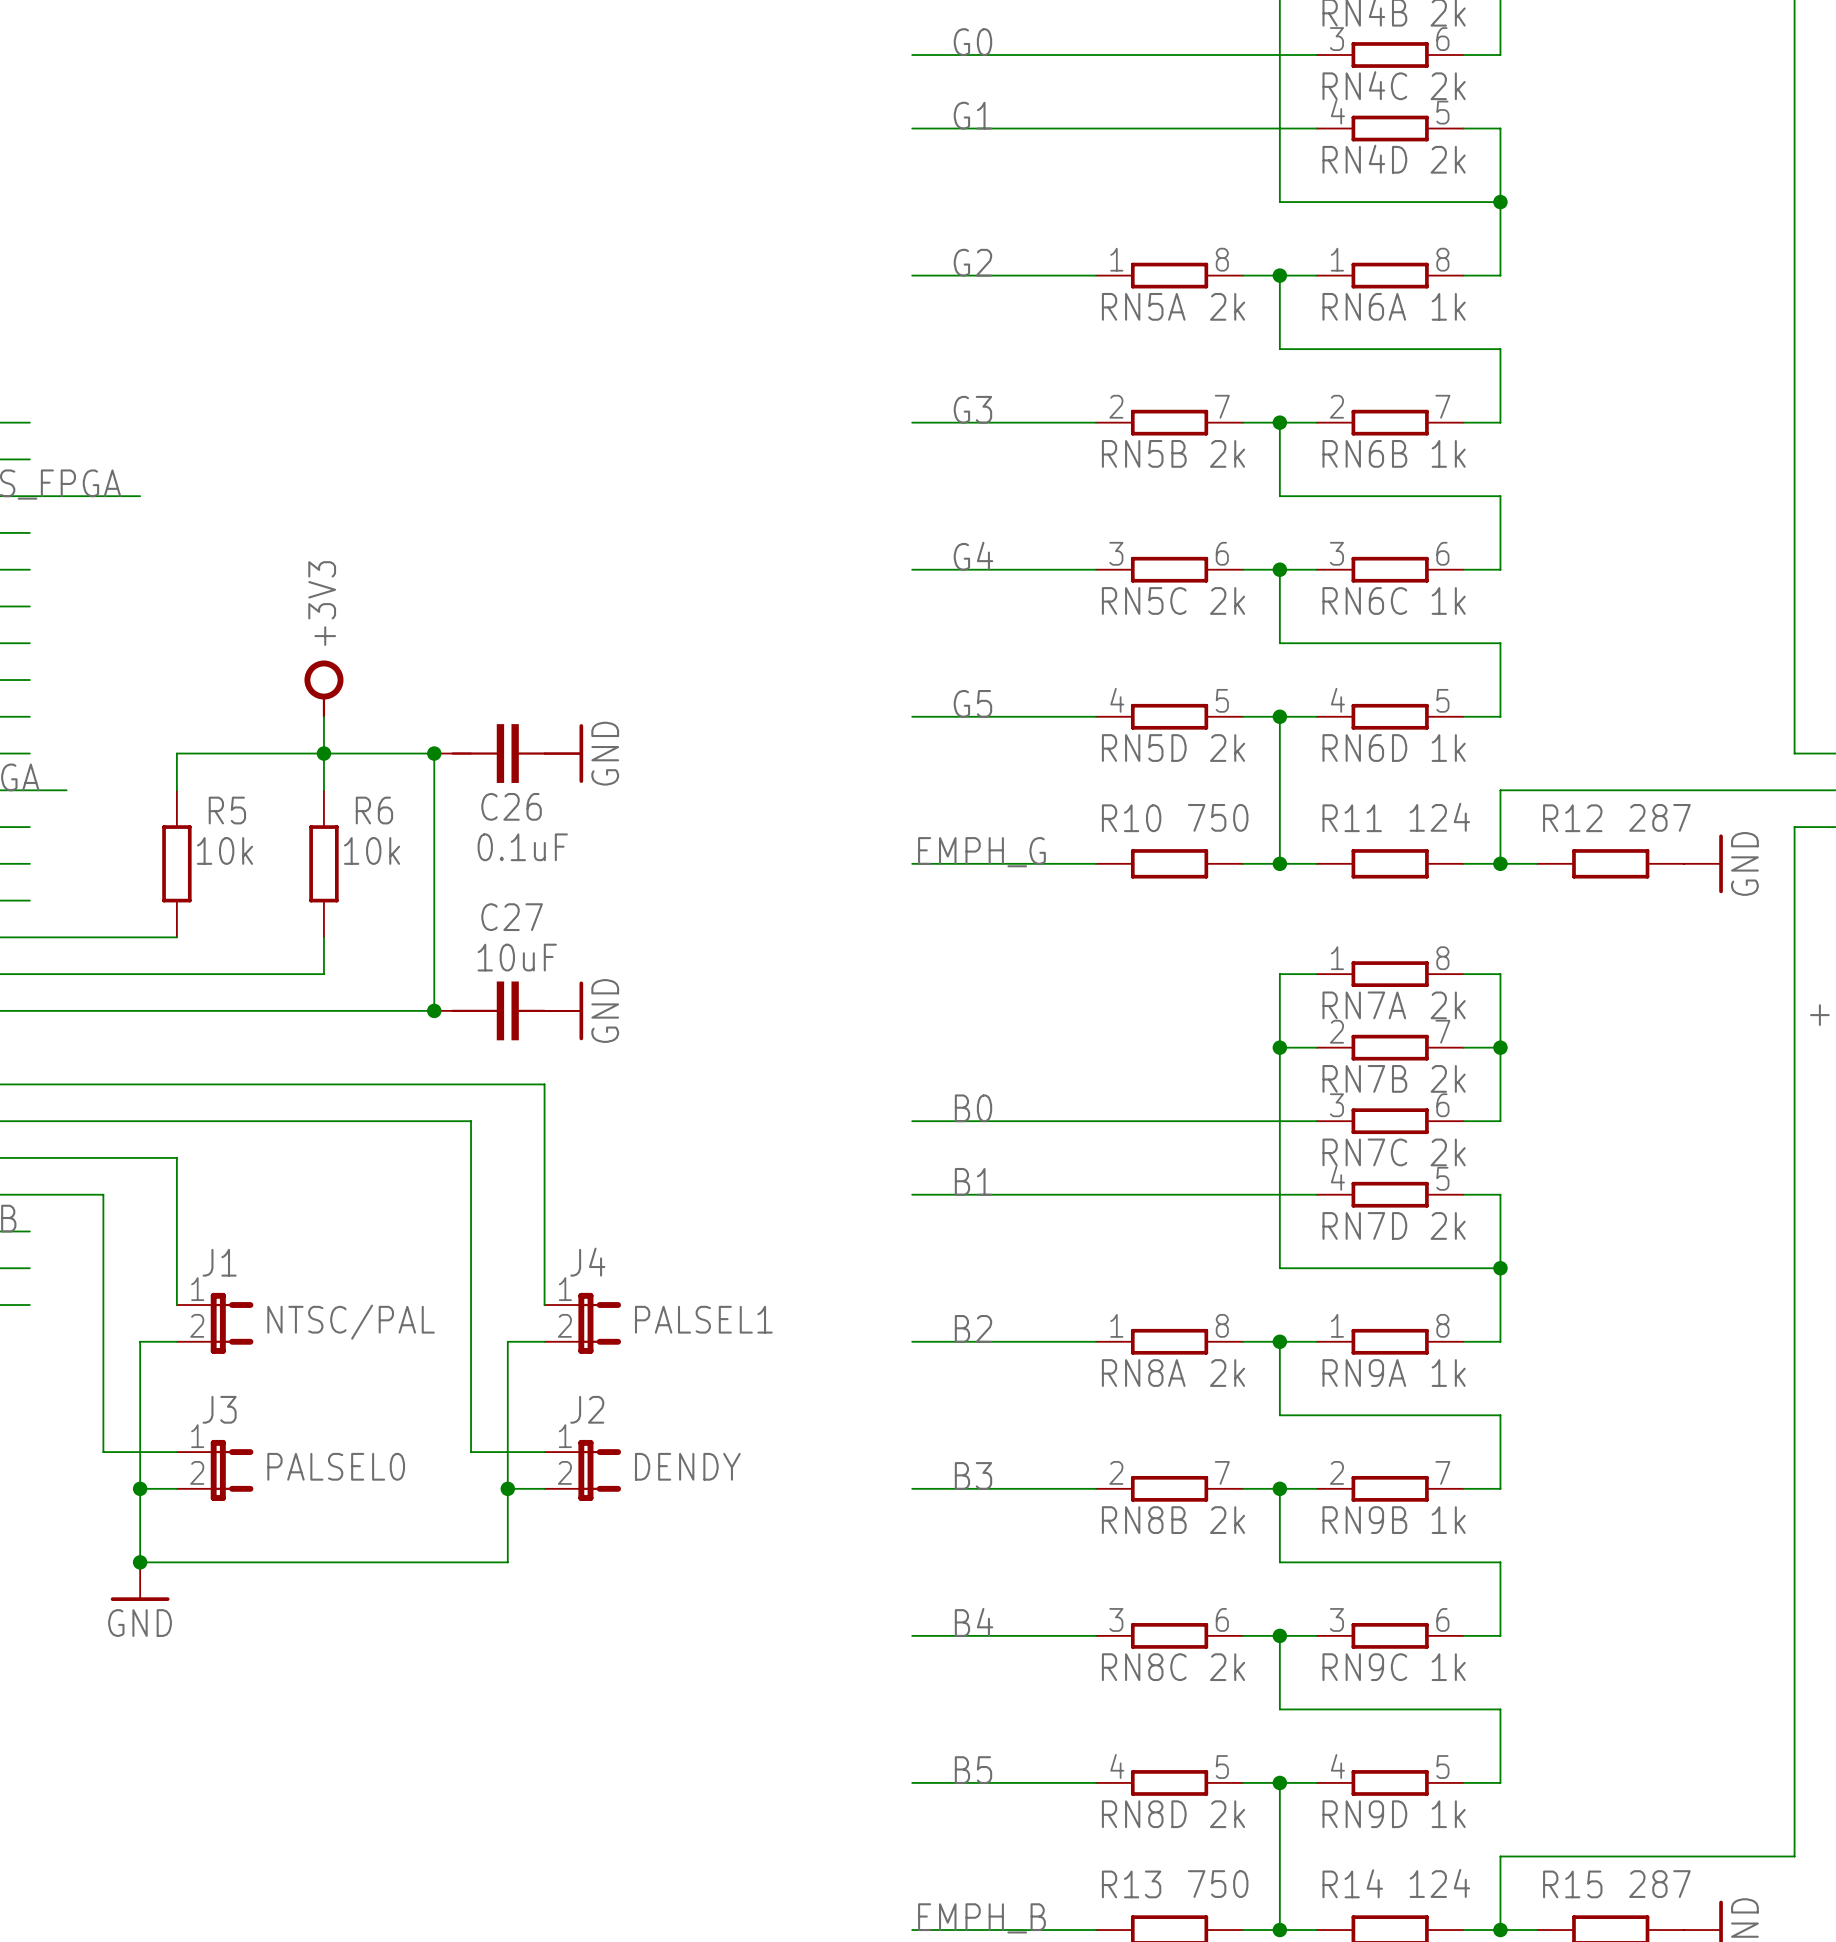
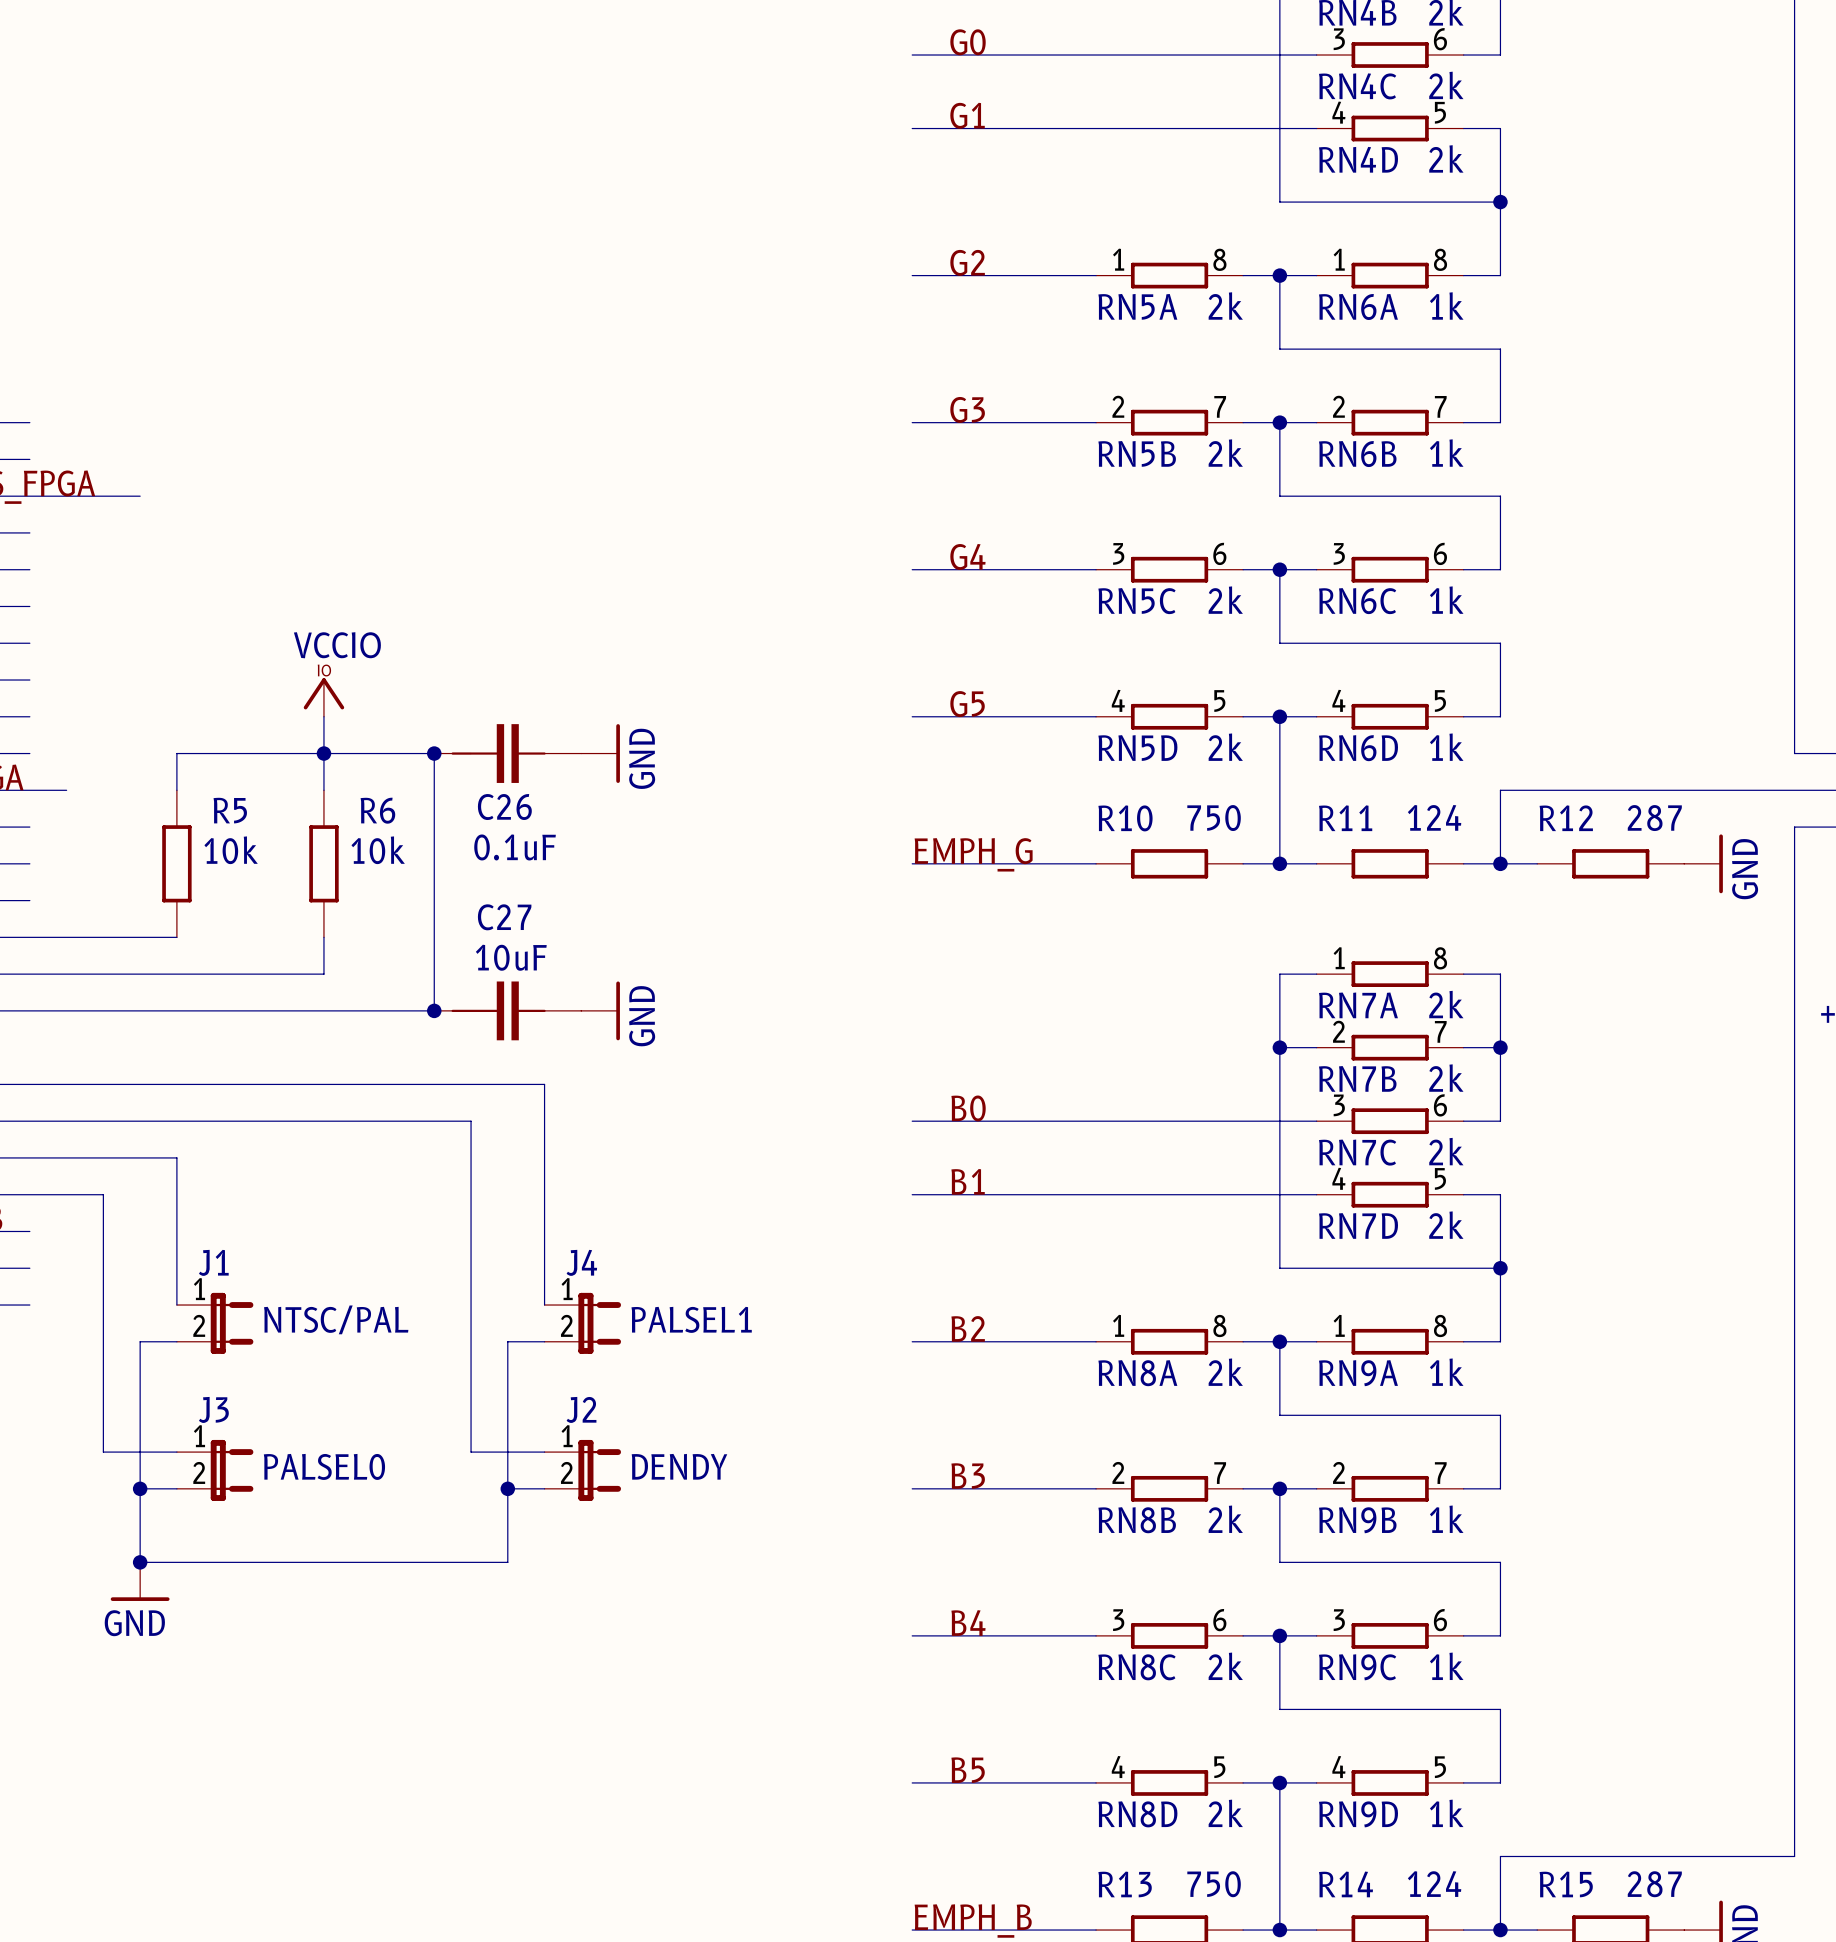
power symbol: +3V3 (323, 689) -> VCCIO (323, 697)
power symbol position: GND (563, 753) -> GND (600, 753)
power symbol position: GND (563, 1010) -> GND (600, 1010)

